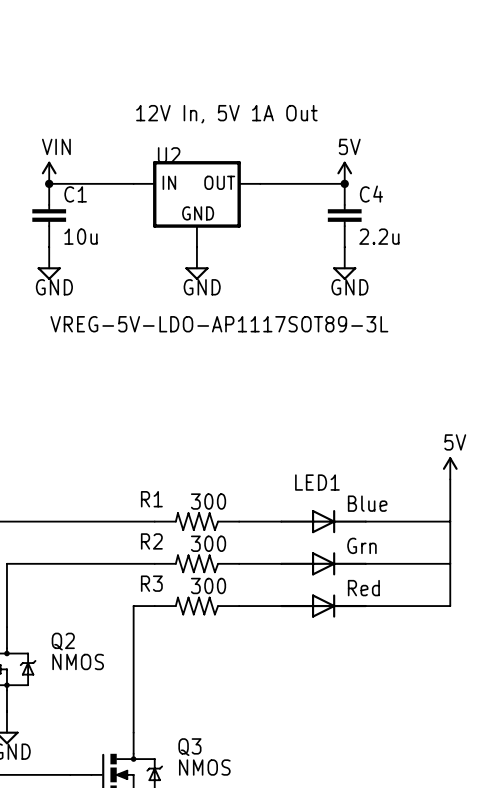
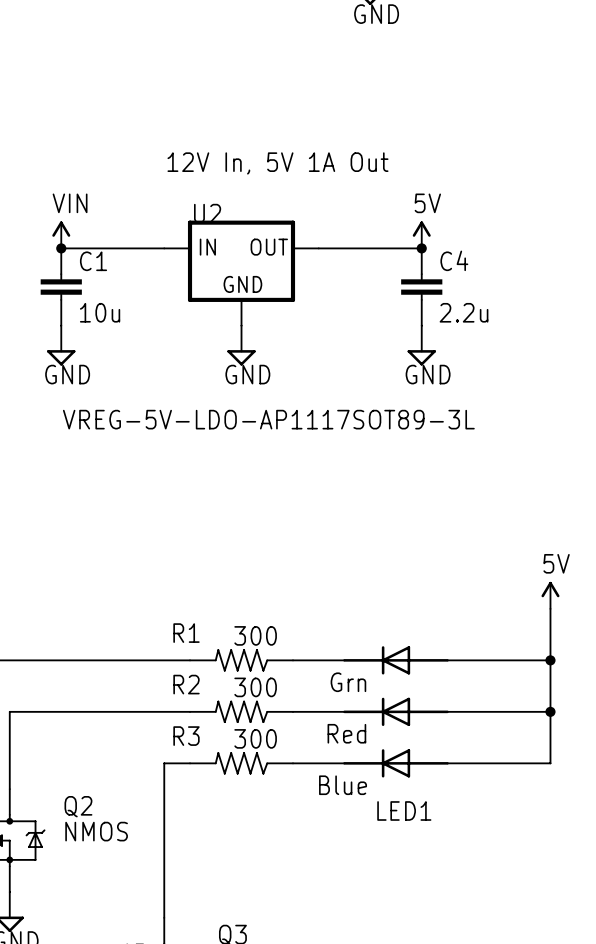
LED1 name position: LED1 (317, 482) -> LED1 (404, 810)
LED1 symbol: [280, 509, 367, 618] -> [343, 646, 449, 778]
junction: none -> (550, 660)
junction: none -> (550, 711)

